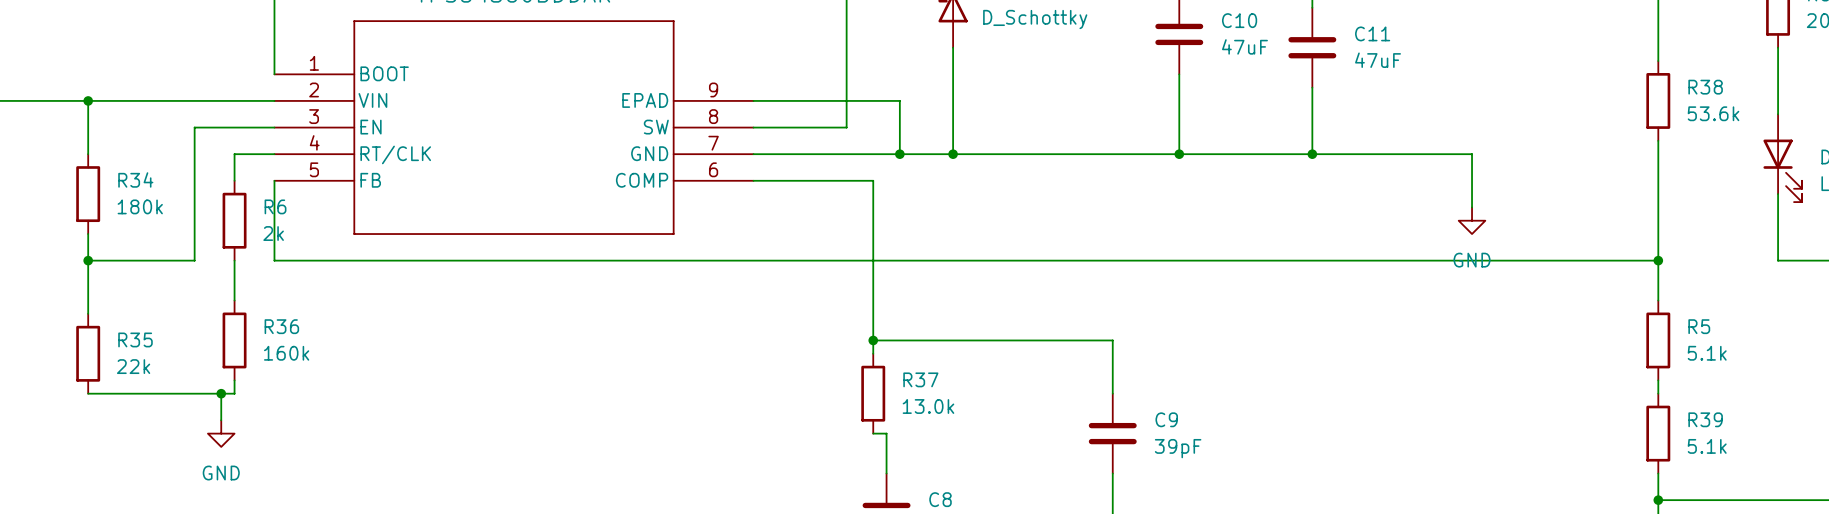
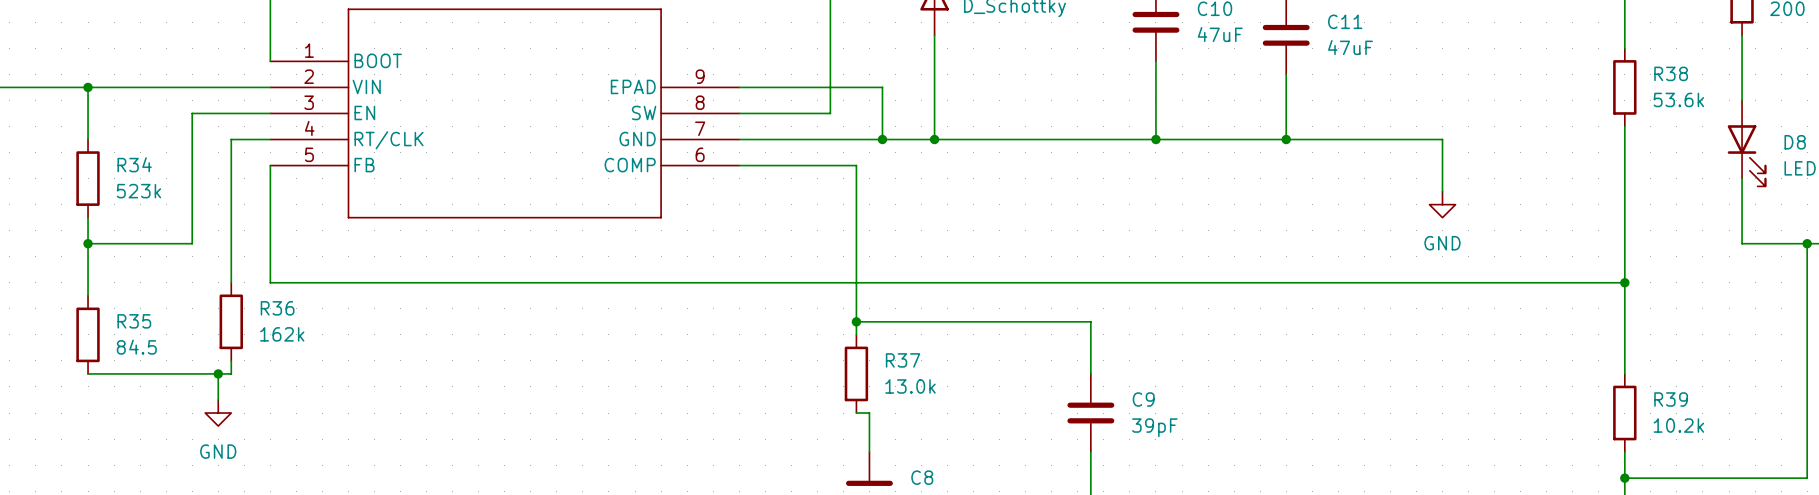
wire: none -> (231, 165) (231, 243)
R34 value: 180k (140, 206) -> 523k (138, 191)
R6: 2k (234, 220) -> none
wire: (274, 260) (1658, 260) -> (270, 243) (270, 282) (1624, 282) (1624, 360)
junction position: (1658, 260) -> (1624, 282)
R5: 5.1k (1658, 340) -> none
R36 value: 160k (286, 353) -> 162k (282, 334)
R35 value: 22k (133, 366) -> 84.5 (136, 347)
R39 value: 5.1k (1707, 446) -> 10.2k (1678, 425)

